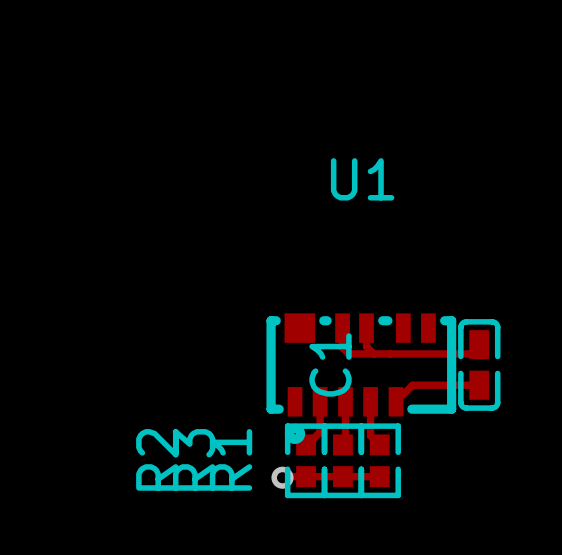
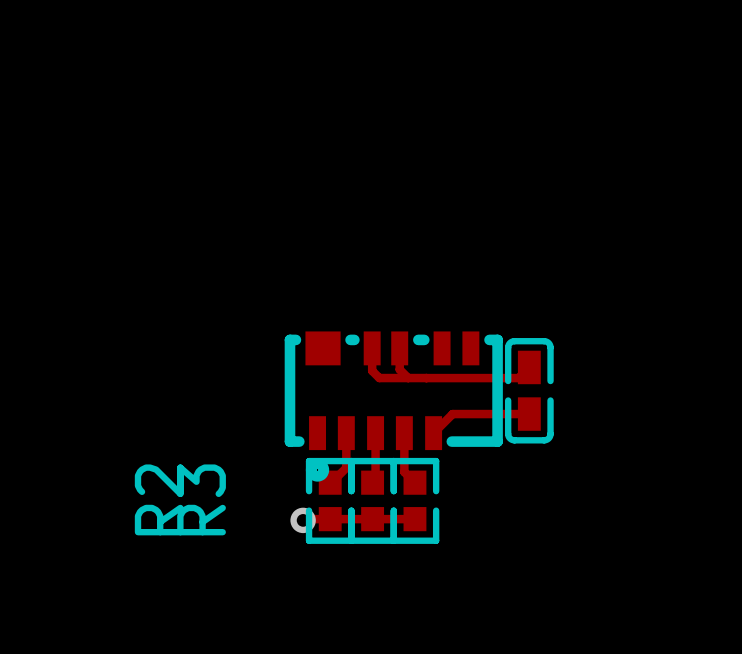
U1 name: U1 (362, 179) -> none
C1 name: C1 (330, 364) -> none
R1 name: R1 (231, 459) -> none

